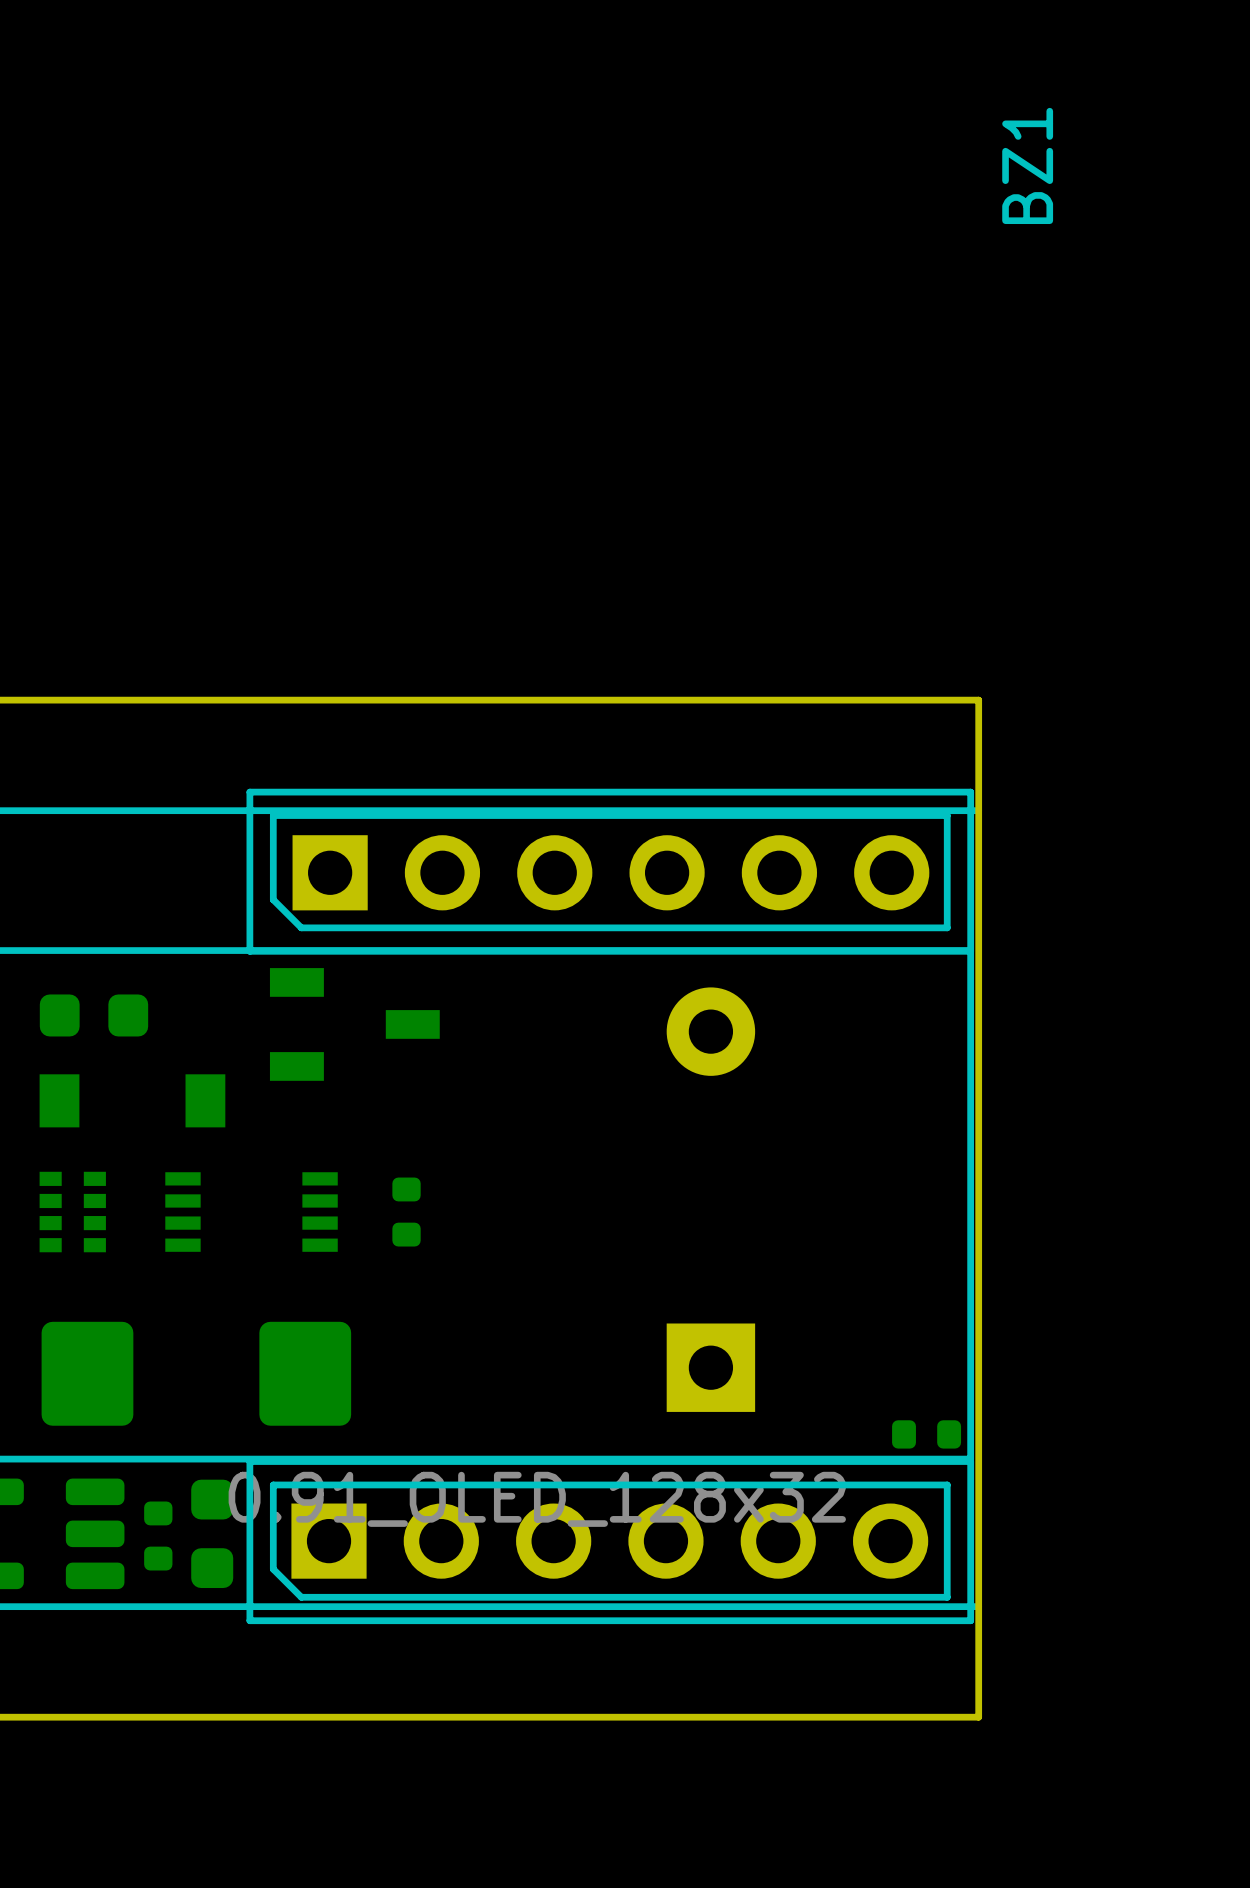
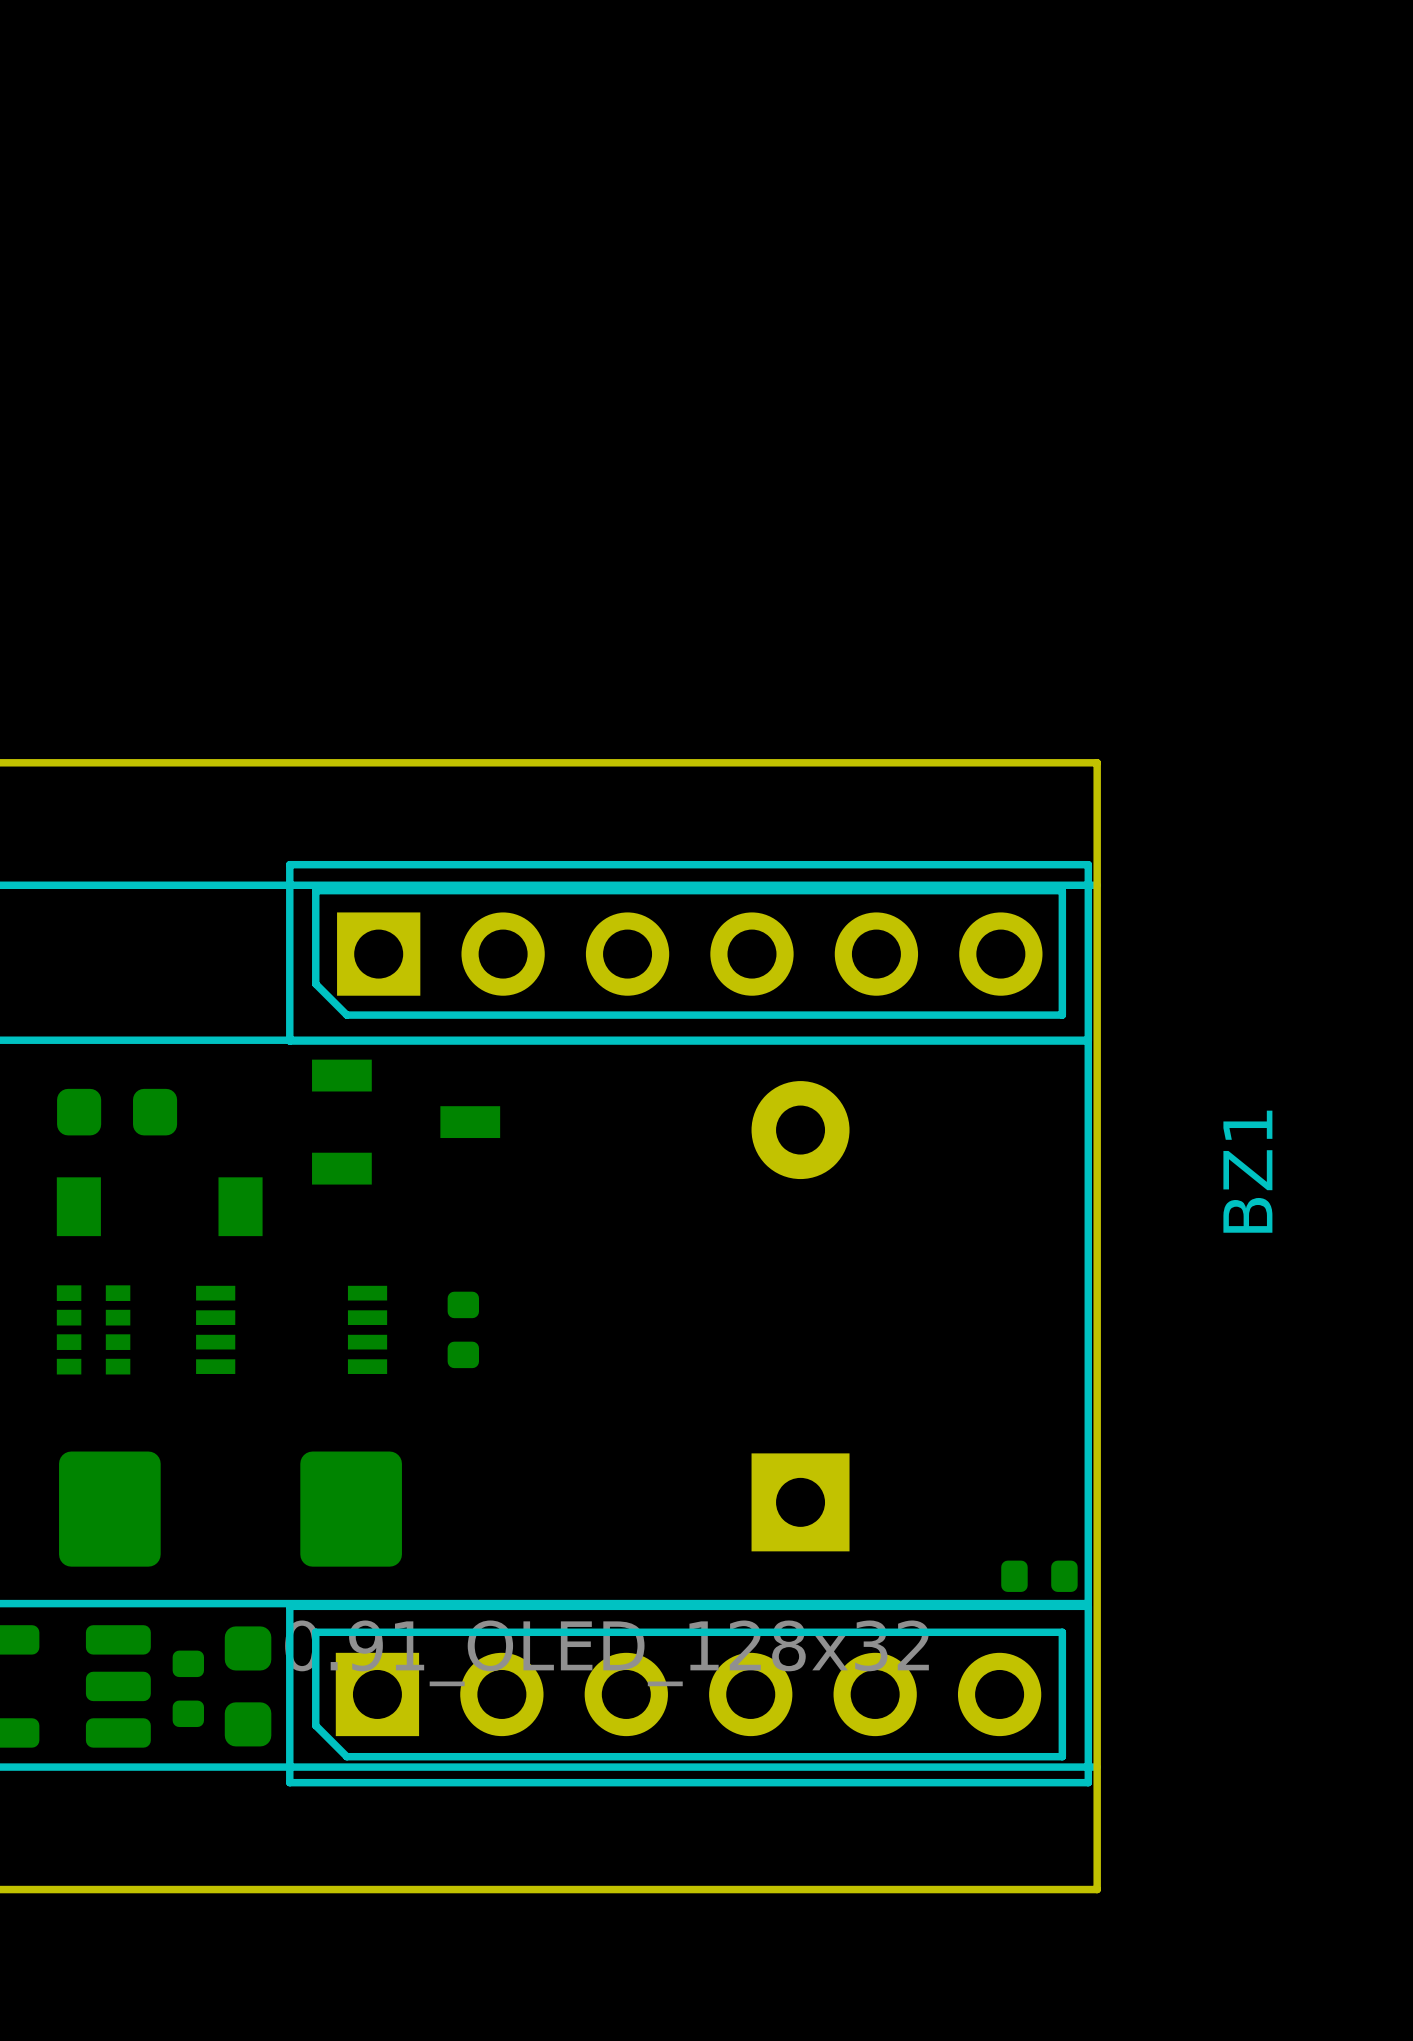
BZ1 name position: BZ1 (1027, 165) -> BZ1 (1247, 1171)

